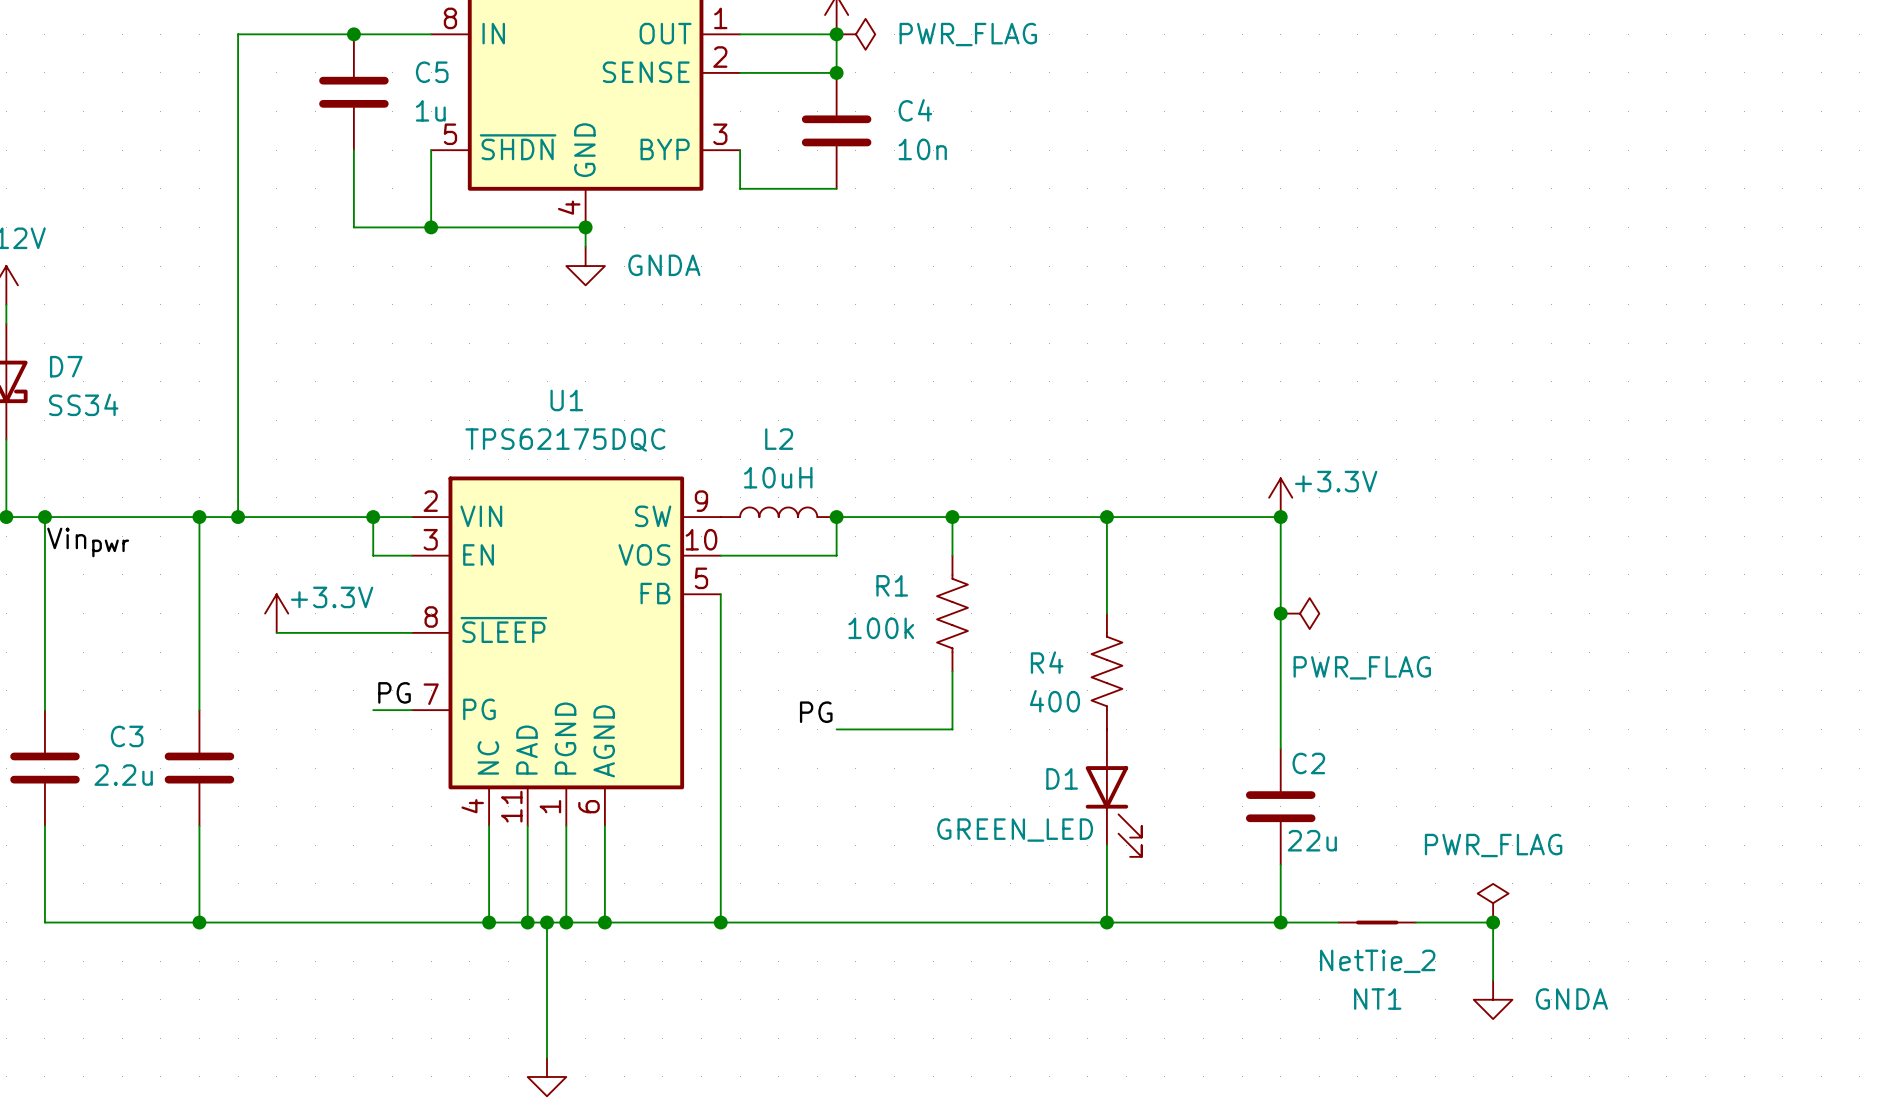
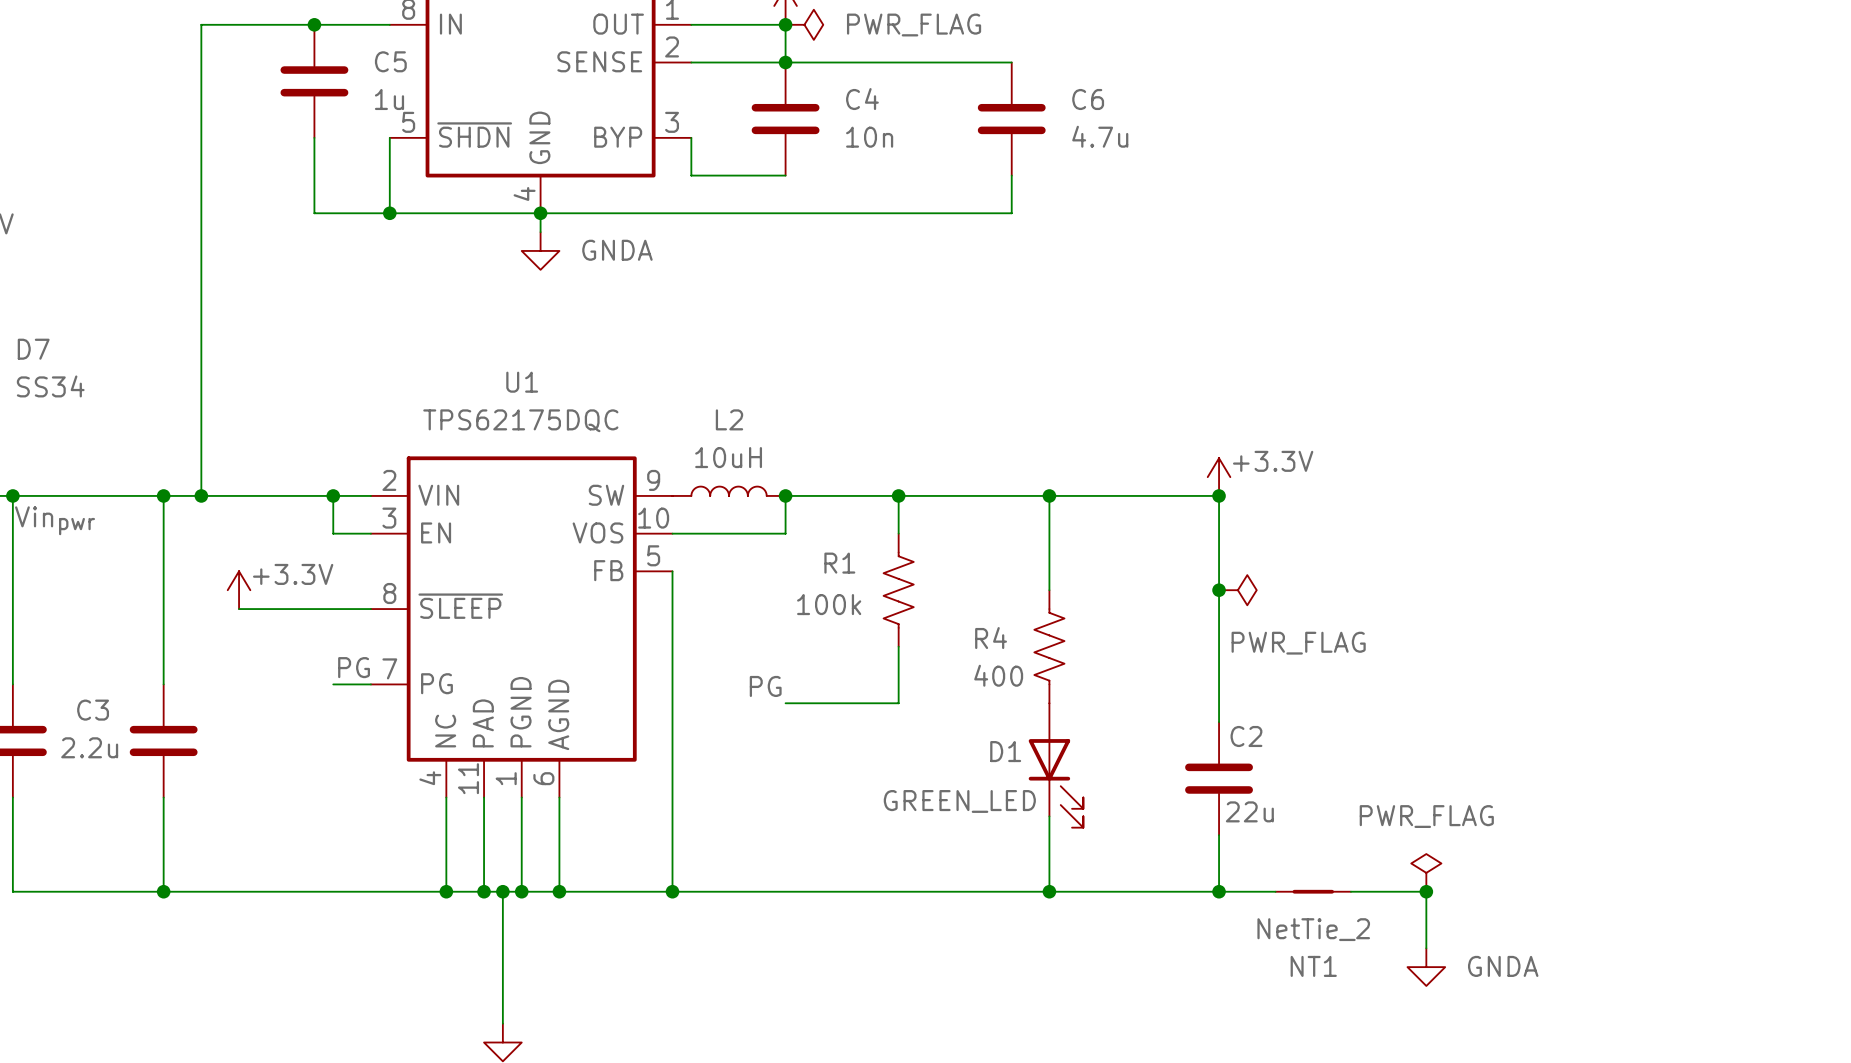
wire: none -> (785, 62) (1011, 62)
C6: none -> 4.7u (1011, 119)
wire: none -> (1011, 175) (1011, 213) (540, 213)

